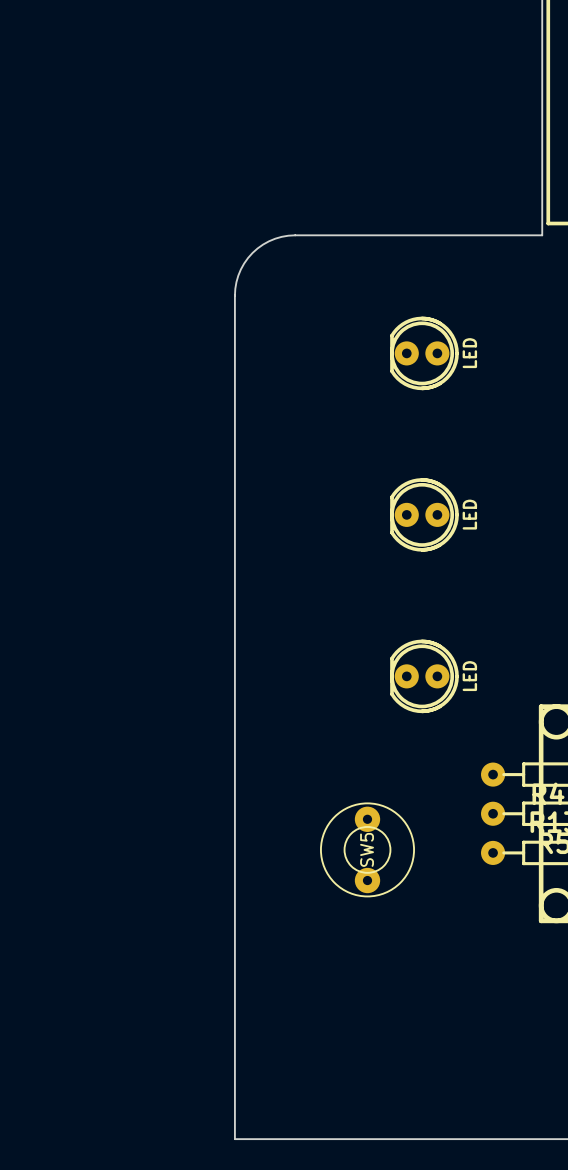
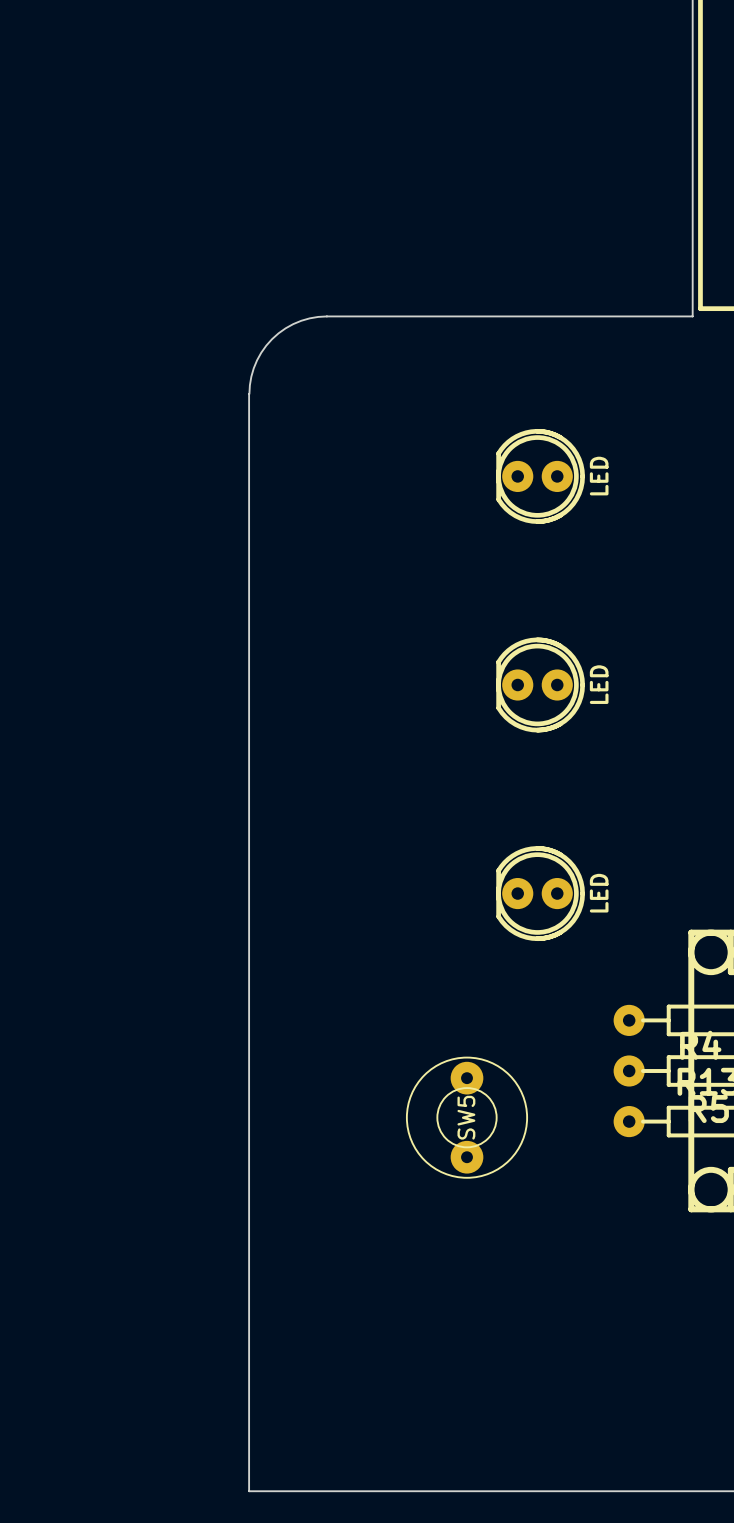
board edge: (542, 229) (542, 235) (288, 235) (269, 241) (257, 248) (248, 258) (238, 275) (234, 295) (234, 1139) -> (249, 393) (249, 1491) (295, 1491)
board edge: none -> (692, 316) (326, 316) (309, 318) (285, 328) (266, 345) (253, 368) (249, 393)

